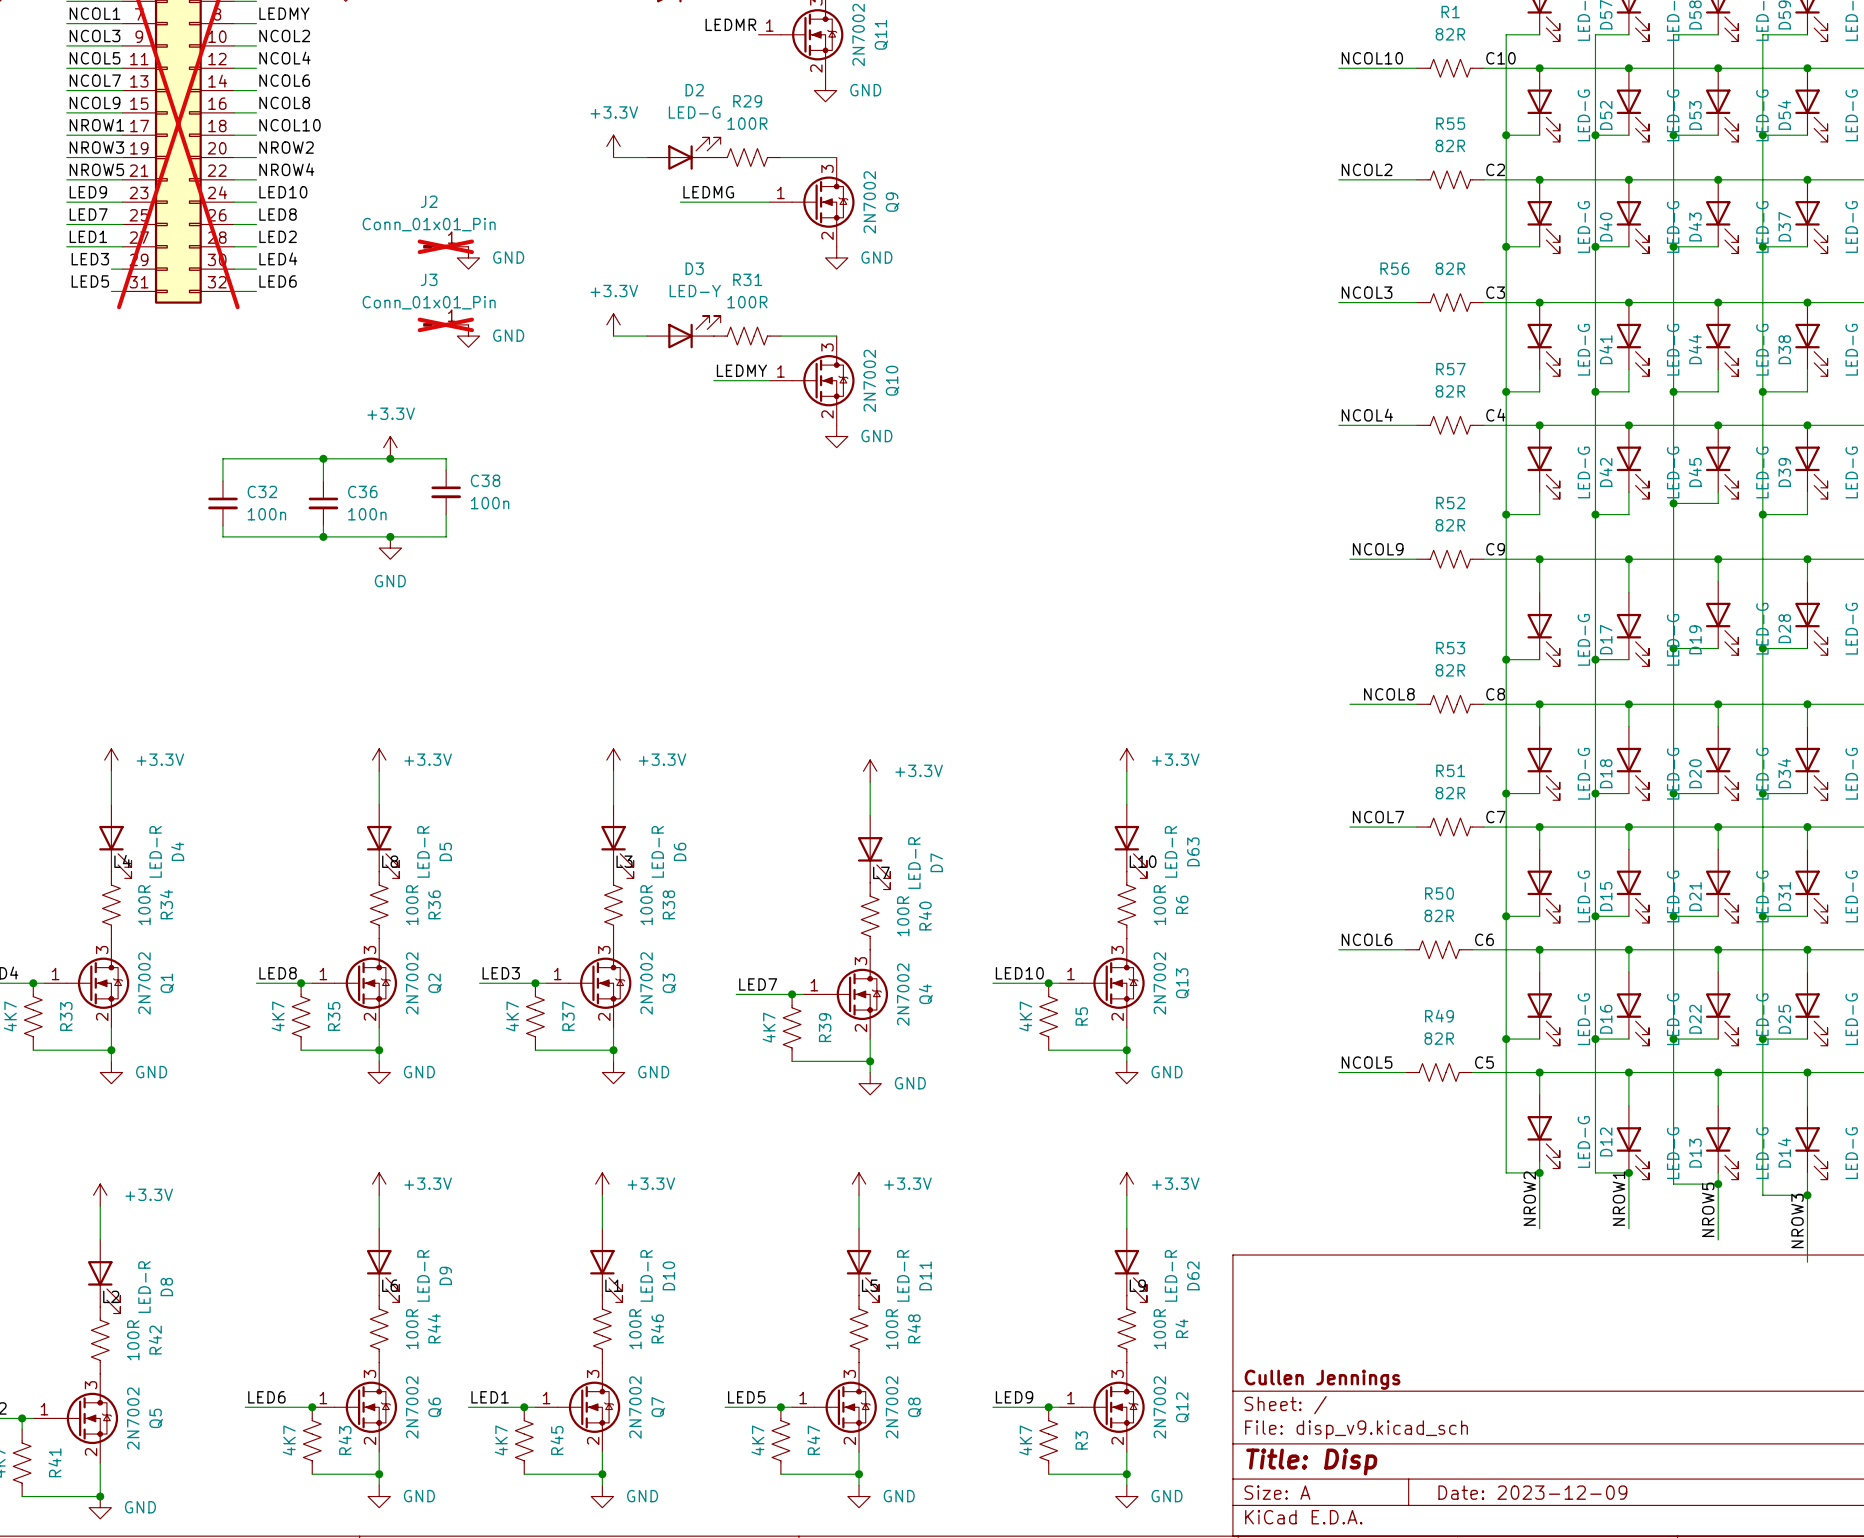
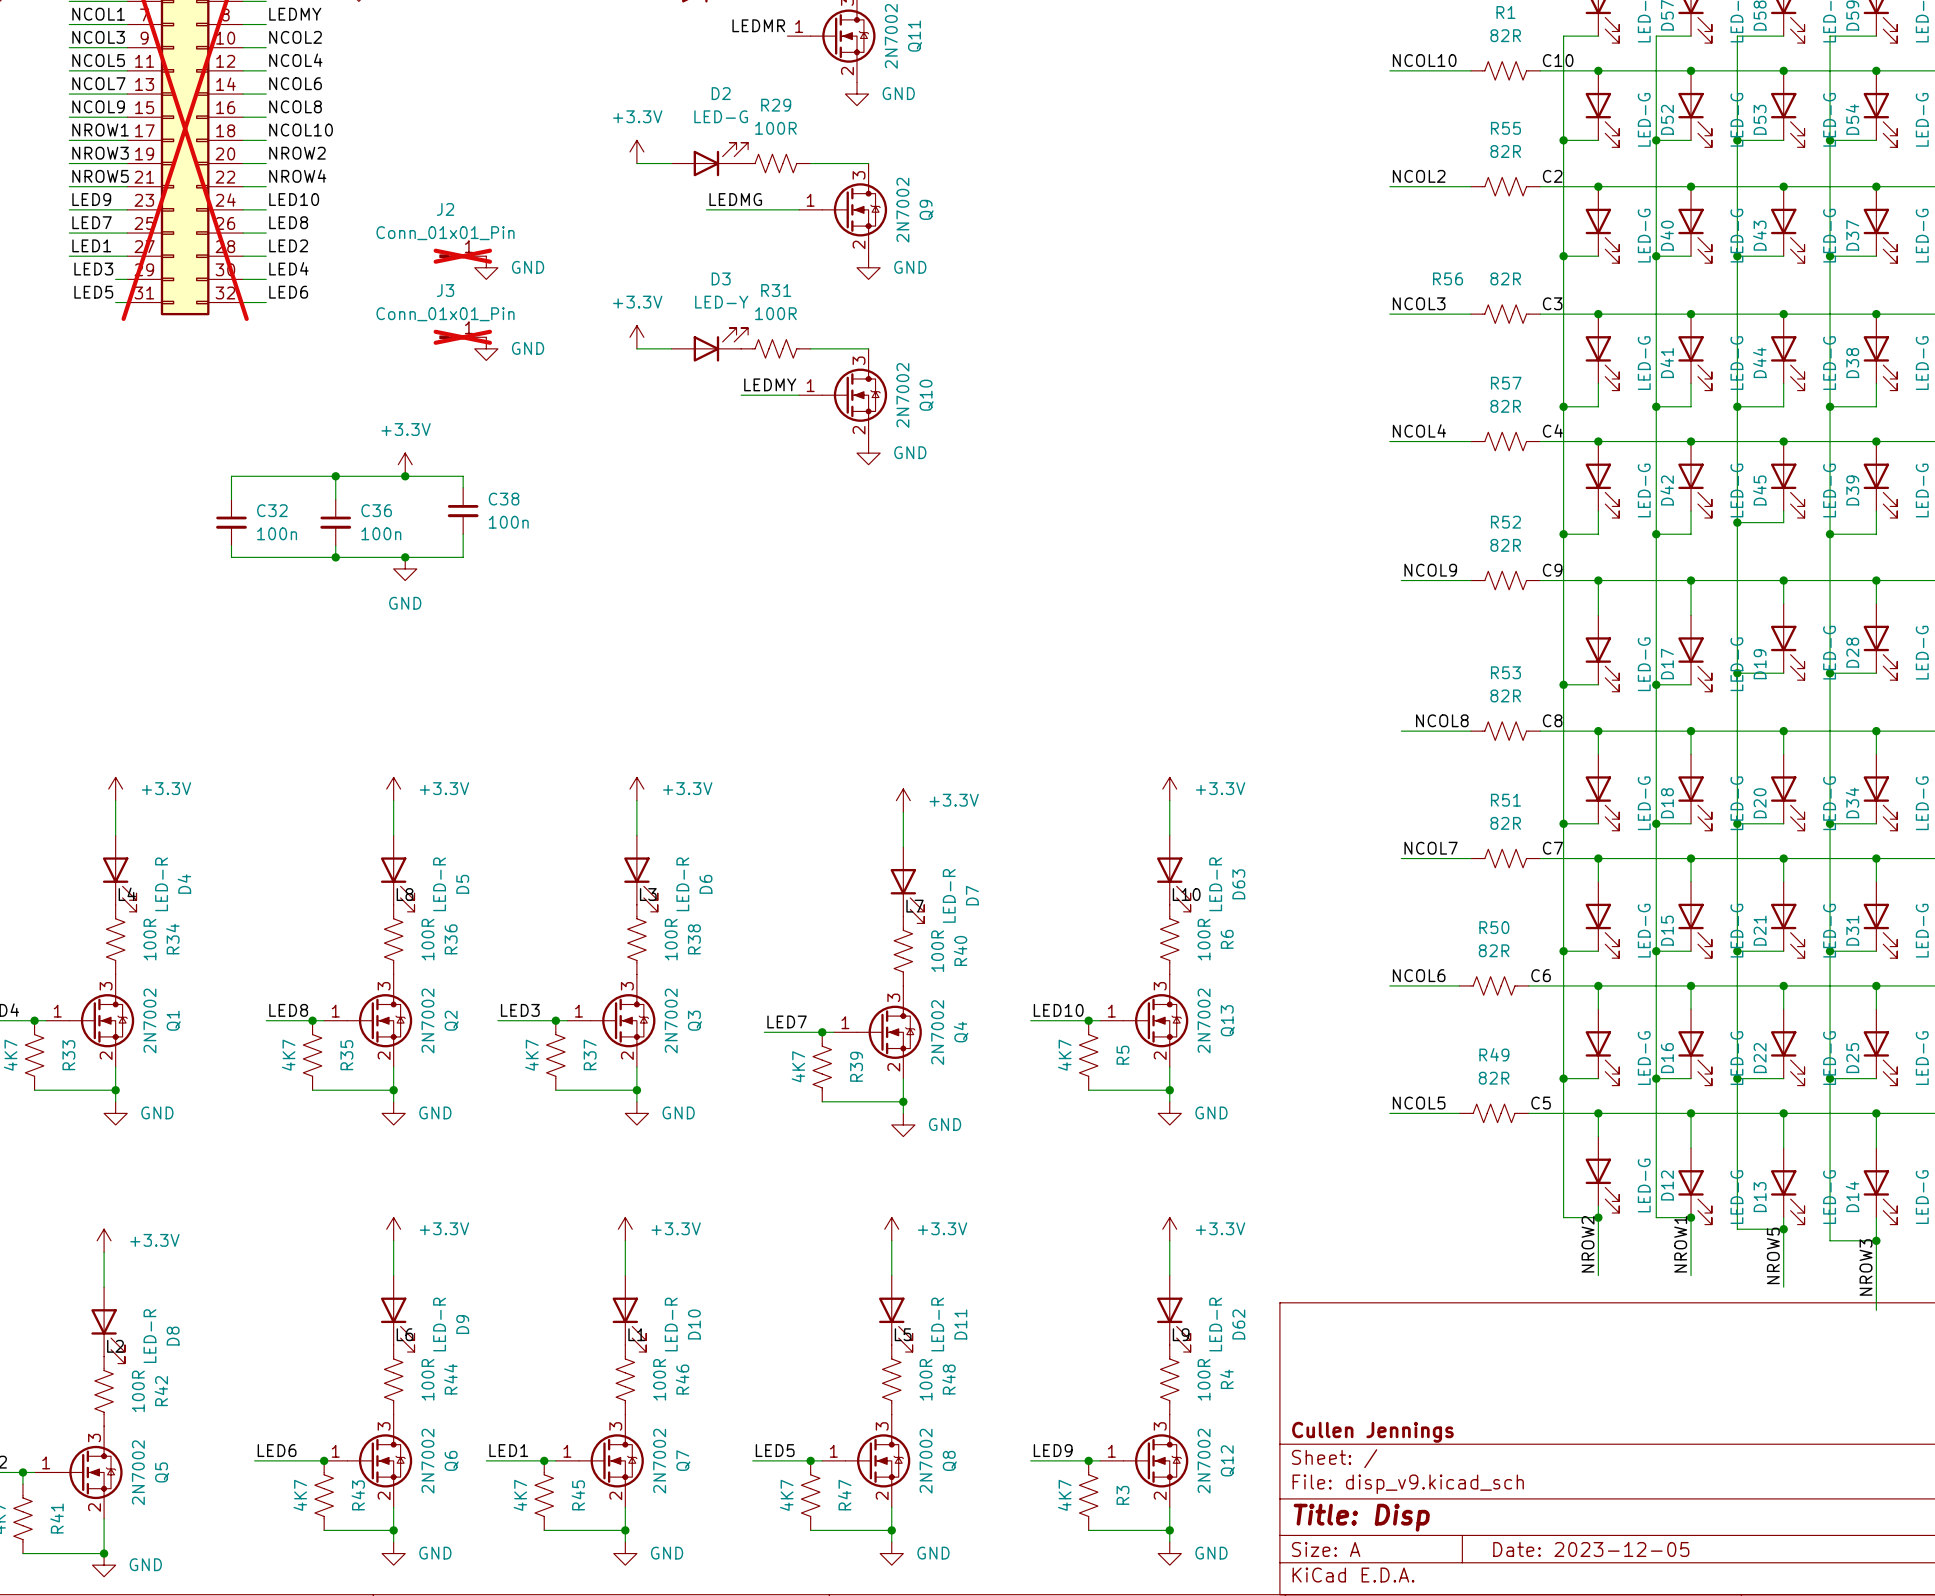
title block: Date: 2023-12-09 (1532, 1492) -> Date: 2023-12-05 (1591, 1549)

